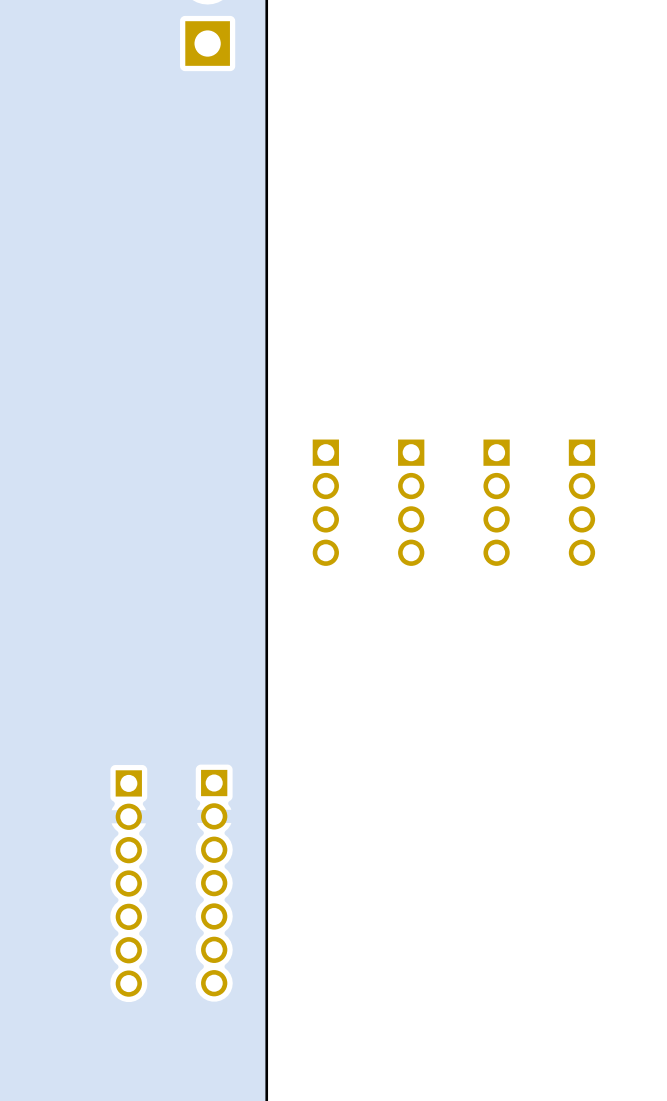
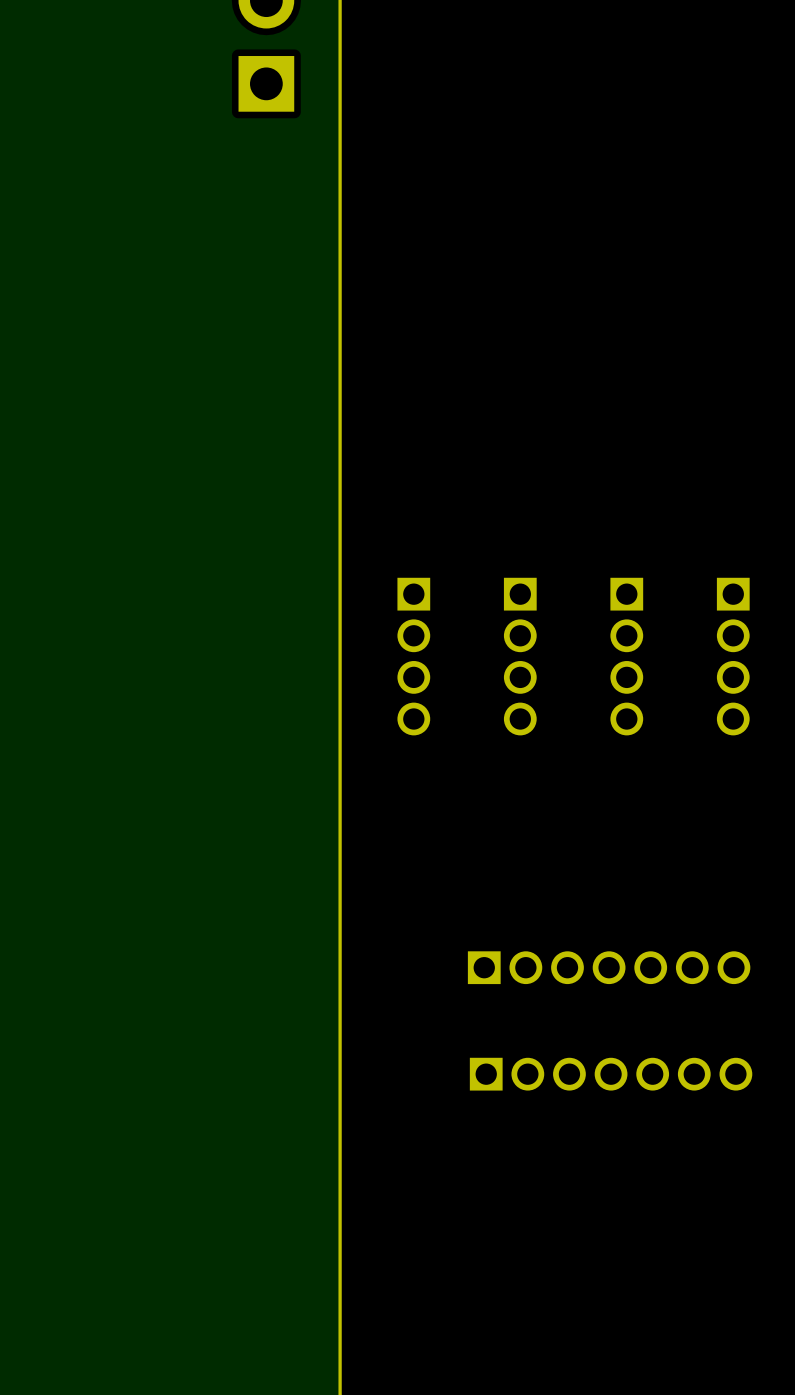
part: none -> (609, 967)
part: none -> (611, 1074)
part: (128, 883) -> none
part: (214, 883) -> none

